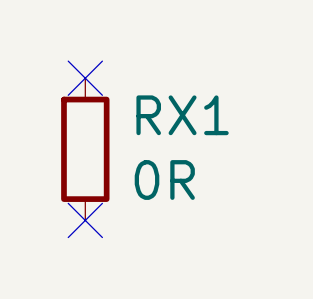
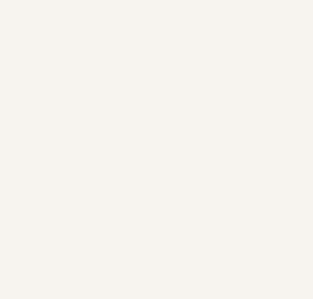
no-connect mark: (85, 78) -> none
RX1: 0R (85, 149) -> none
no-connect mark: (85, 220) -> none

